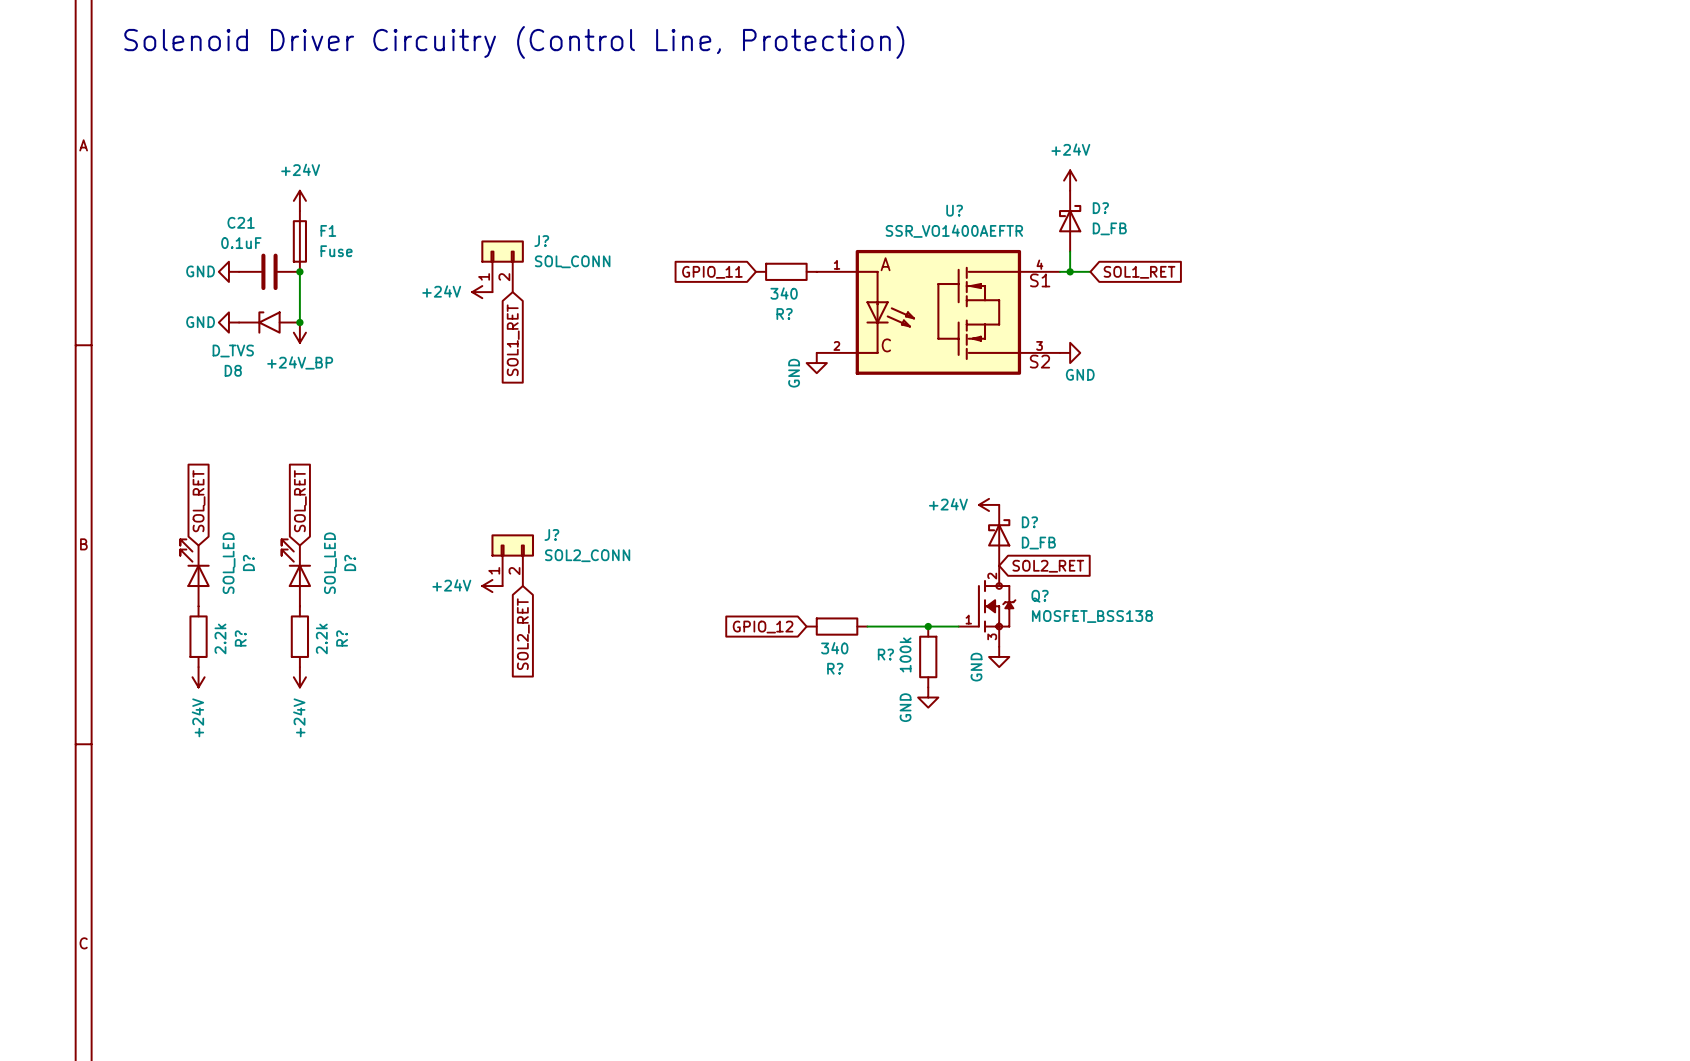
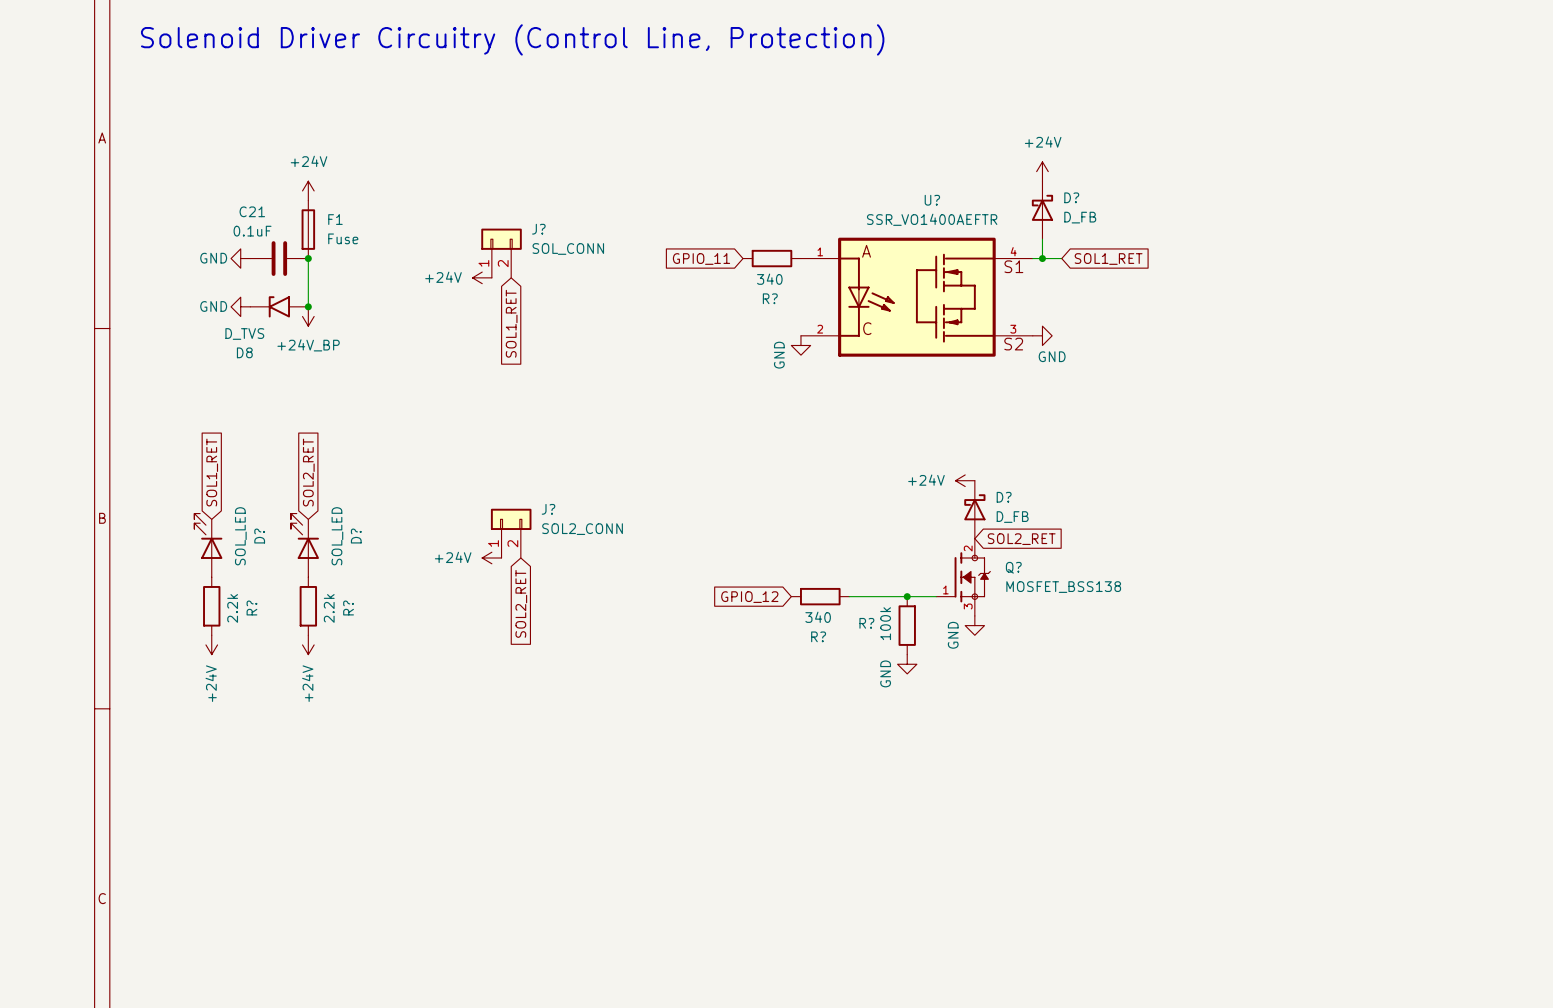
global label: SOL_RET (199, 501) -> SOL1_RET (212, 472)
global label: SOL_RET (300, 501) -> SOL2_RET (308, 472)

